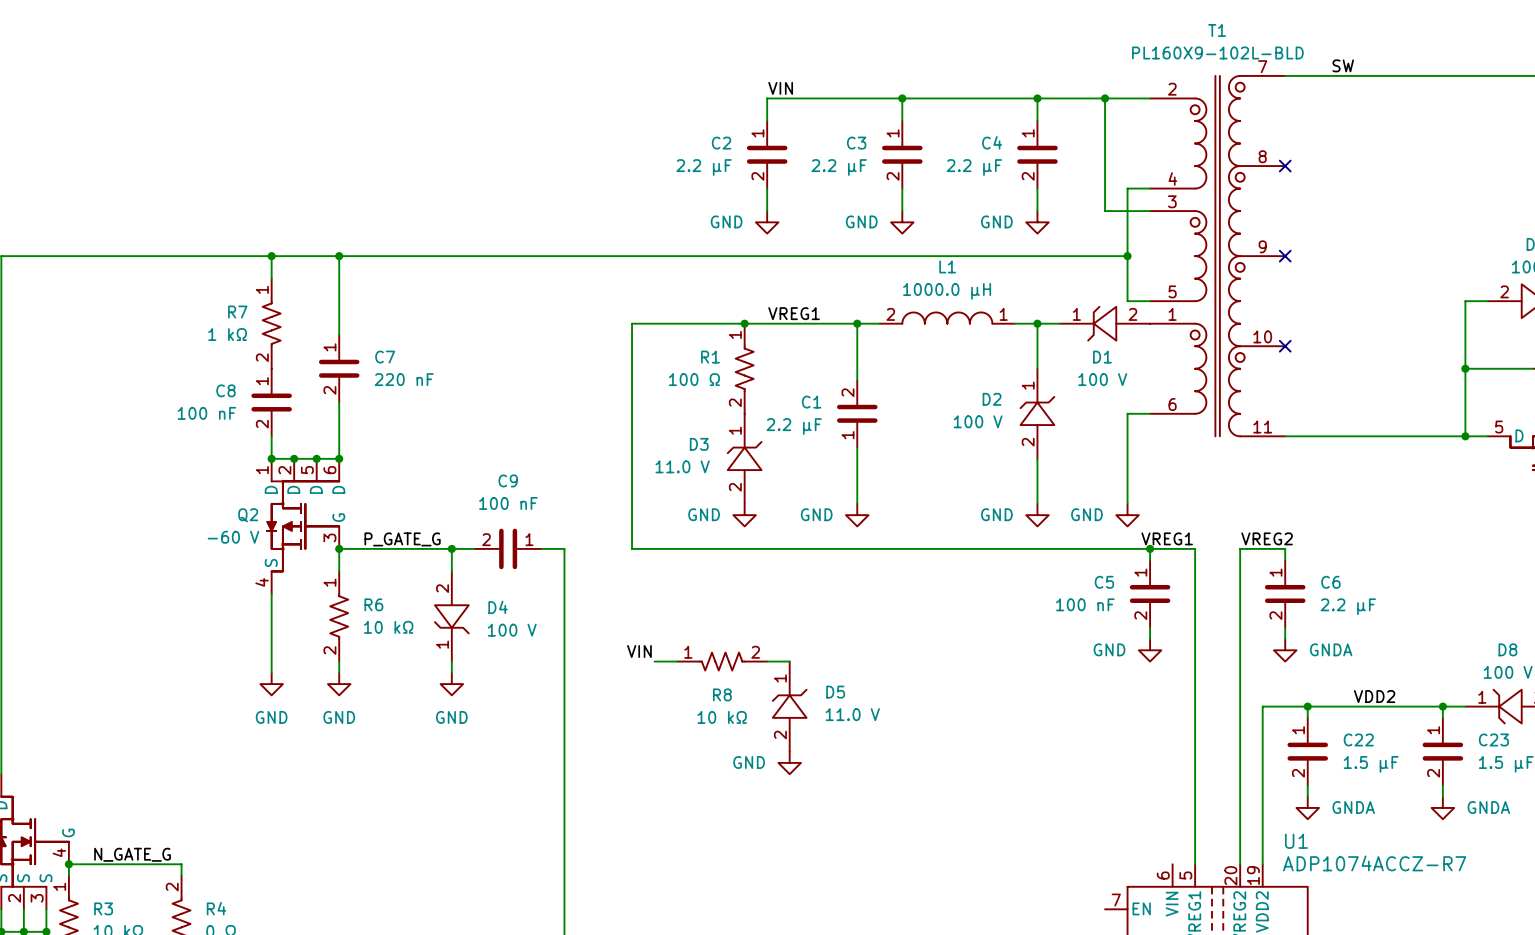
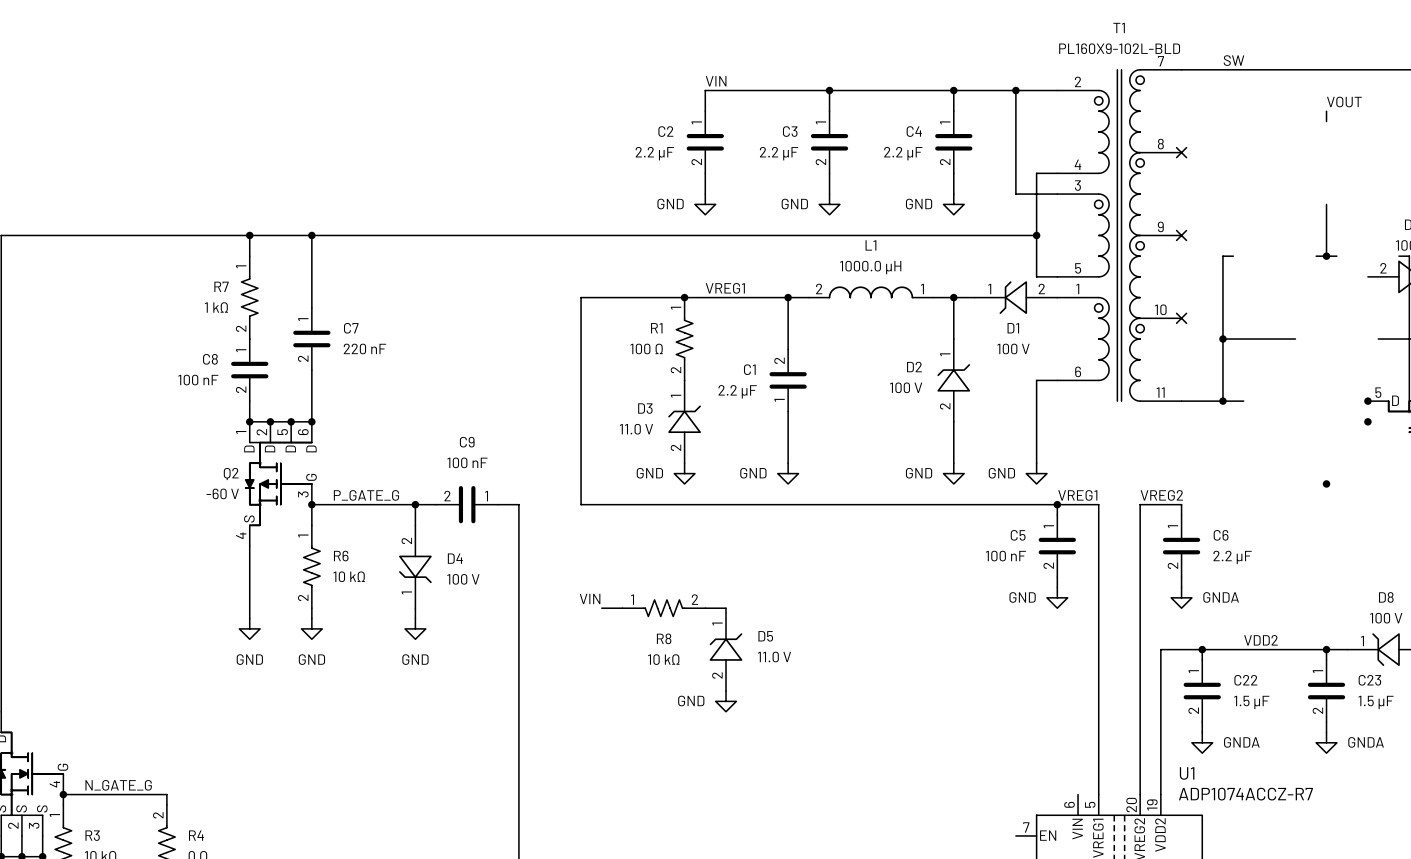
label: none -> VOUT (1344, 101)
wire: none -> (1326, 111) (1326, 121)
wire: none -> (1326, 204) (1326, 256)
wire: none -> (1233, 256) (1222, 256) (1222, 401)
wire: none -> (1316, 256) (1336, 256)
junction: none -> (1326, 256)
wire: none -> (1398, 256) (1409, 256) (1409, 401)
wire: (1487, 301) (1465, 301) (1465, 436) -> none
wire: none -> (1222, 339) (1295, 339)
junction: none -> (1222, 339)
wire: (1465, 368) (1499, 368) -> none
junction: (1465, 368) -> none
junction: none -> (1222, 401)
wire: (1352, 436) (1487, 436) -> none
junction: (1465, 436) -> none
junction: none -> (1367, 401)
junction: none -> (1367, 421)
junction: none -> (1326, 483)

